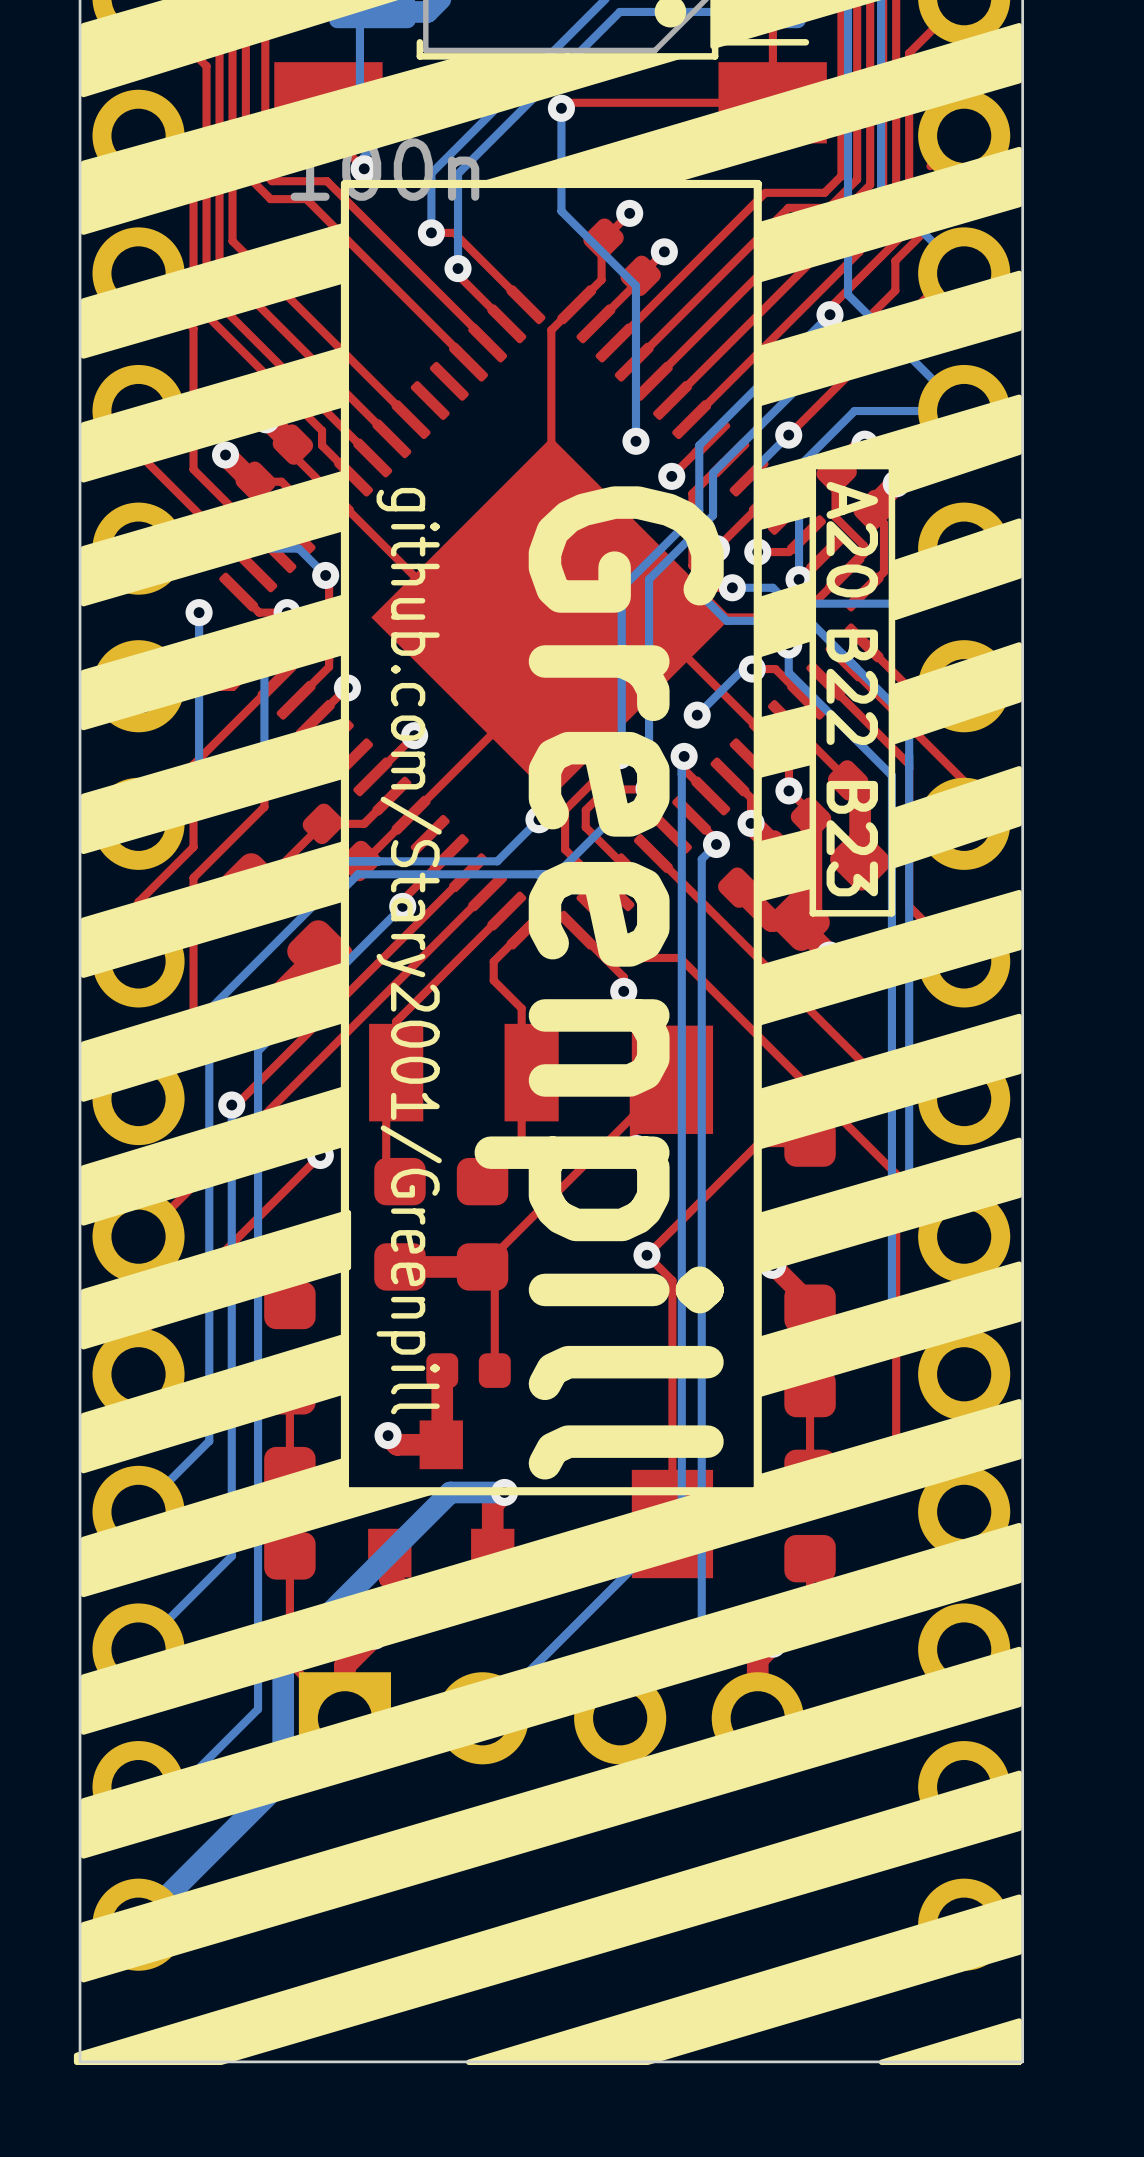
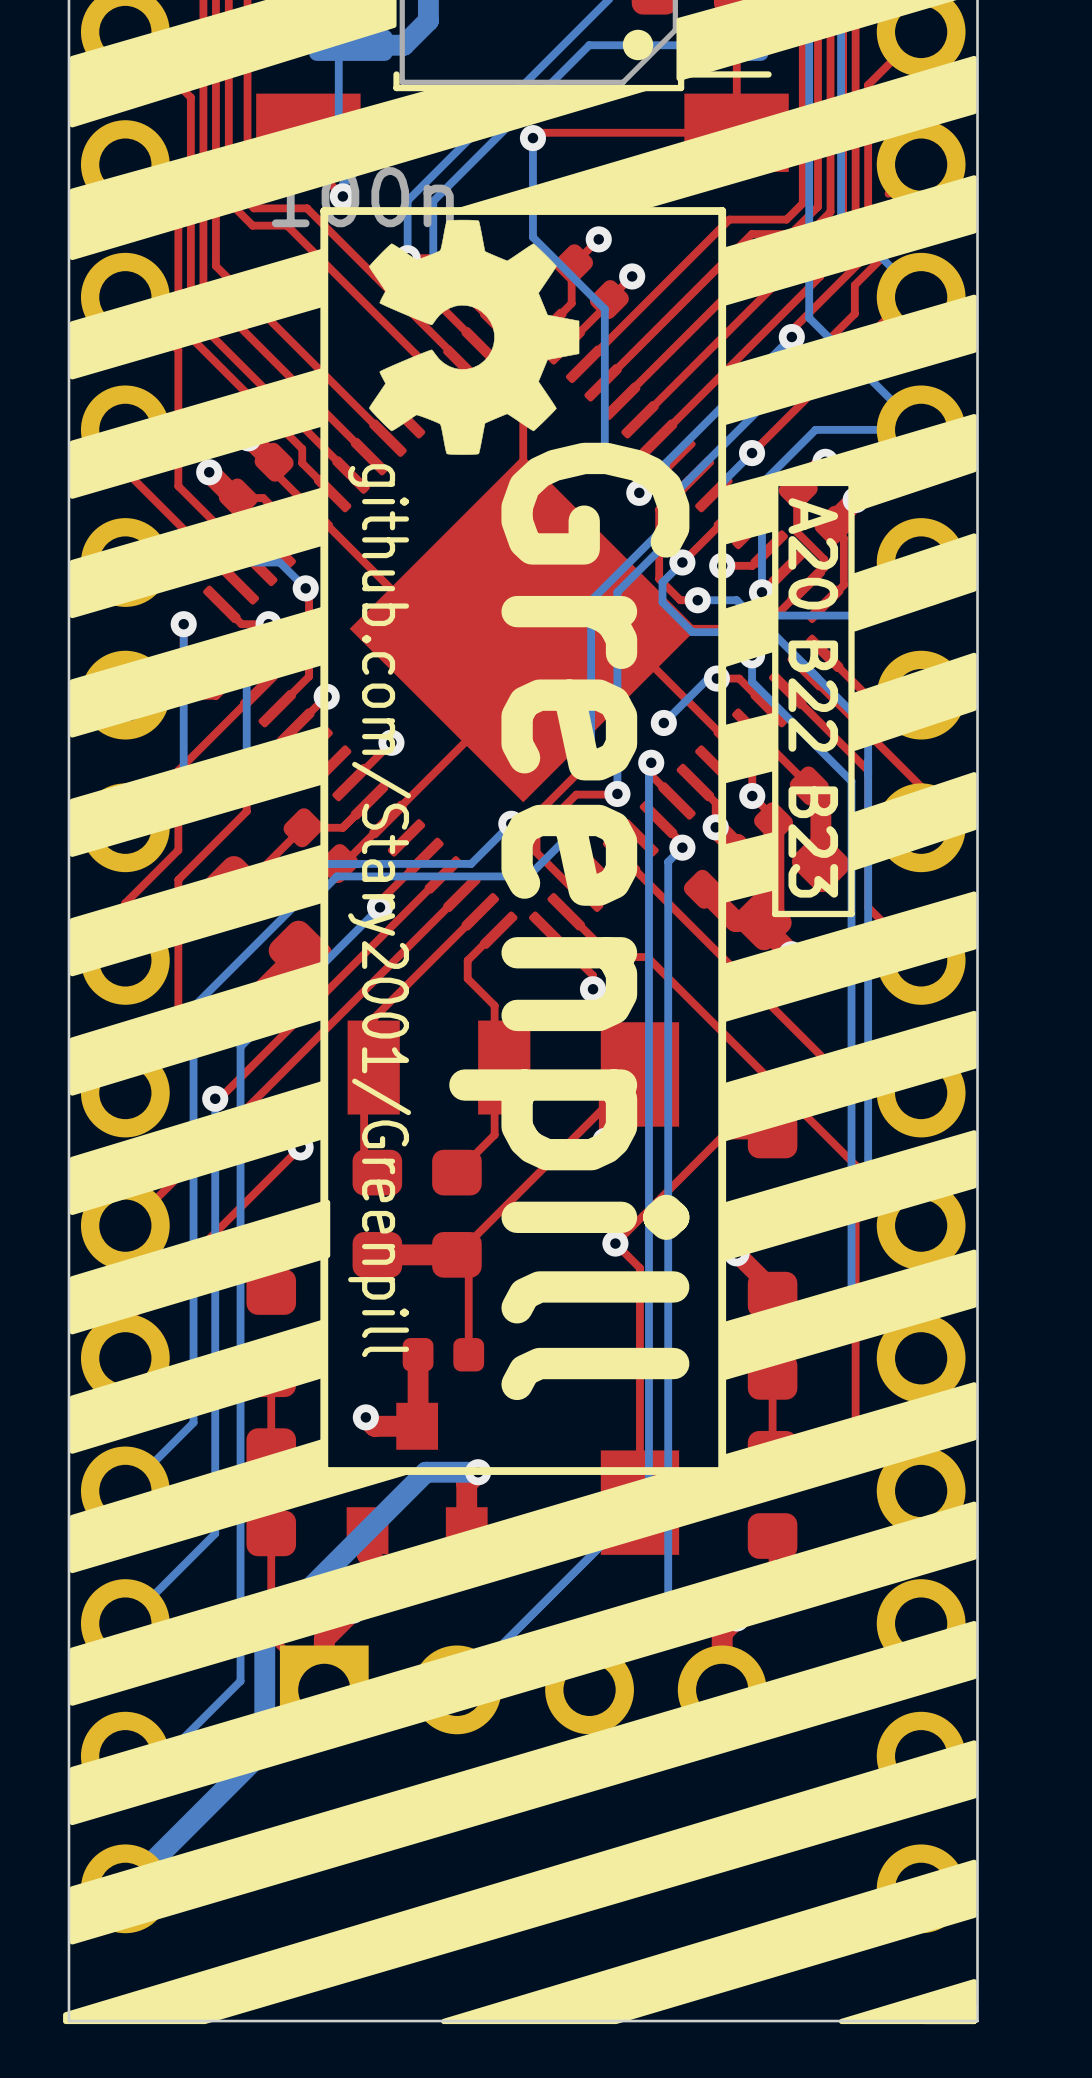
drawing: none -> [369, 219, 580, 455]
text position: github.com/Stary2001/Greenpill (409, 951) -> github.com/Stary2001/Greenpill (379, 910)
text position: Greenpill (599, 982) -> Greenpill (569, 921)

